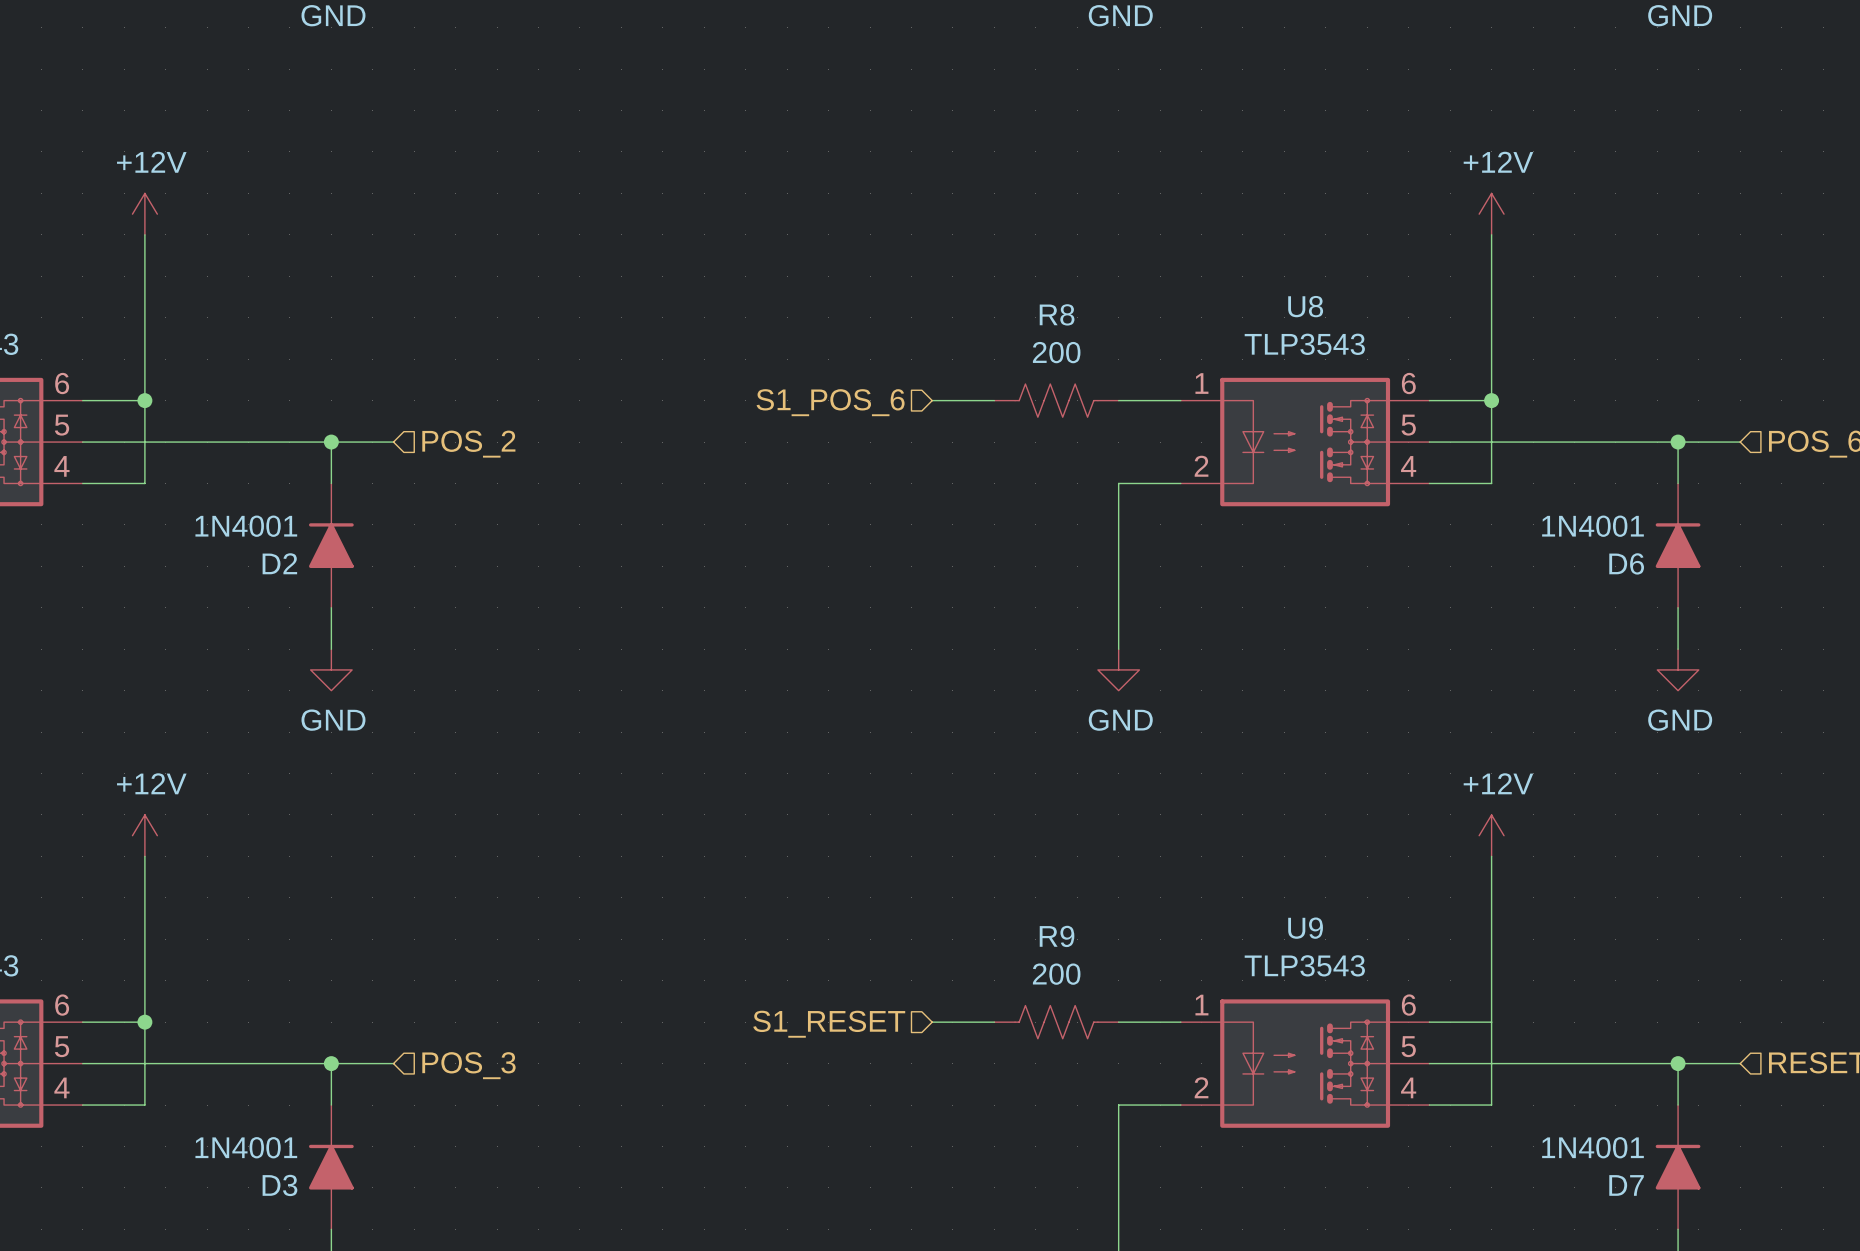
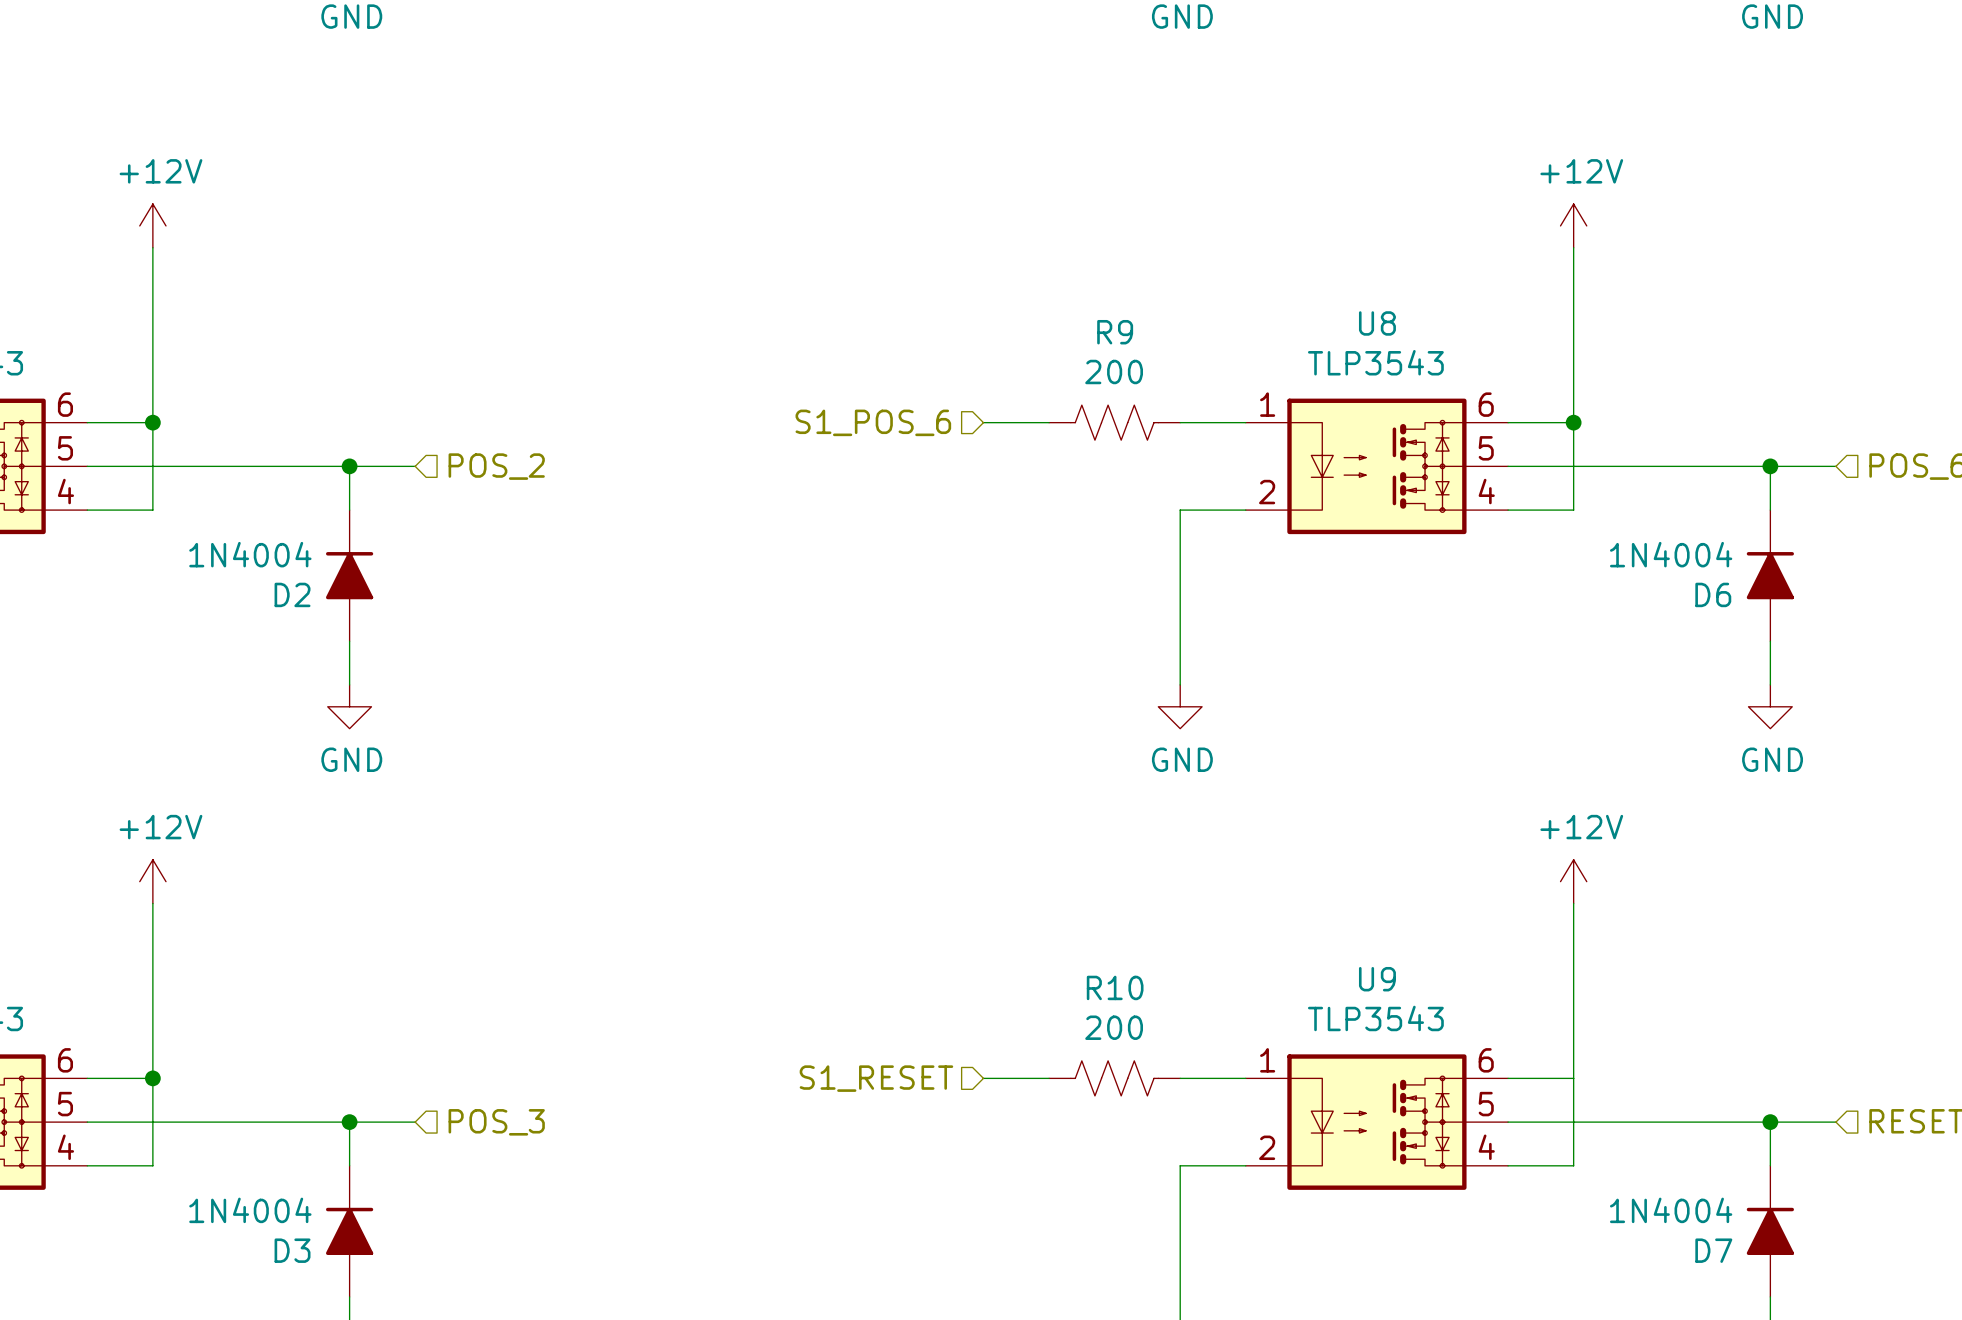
R8 name: R8 (1057, 314) -> R9 (1115, 332)
D2 value: 1N4001 (246, 526) -> 1N4004 (250, 554)
D6 value: 1N4001 (1592, 526) -> 1N4004 (1671, 554)
R9 name: R9 (1057, 936) -> R10 (1115, 987)
D3 value: 1N4001 (246, 1147) -> 1N4004 (250, 1210)
D7 value: 1N4001 (1592, 1147) -> 1N4004 (1671, 1210)

